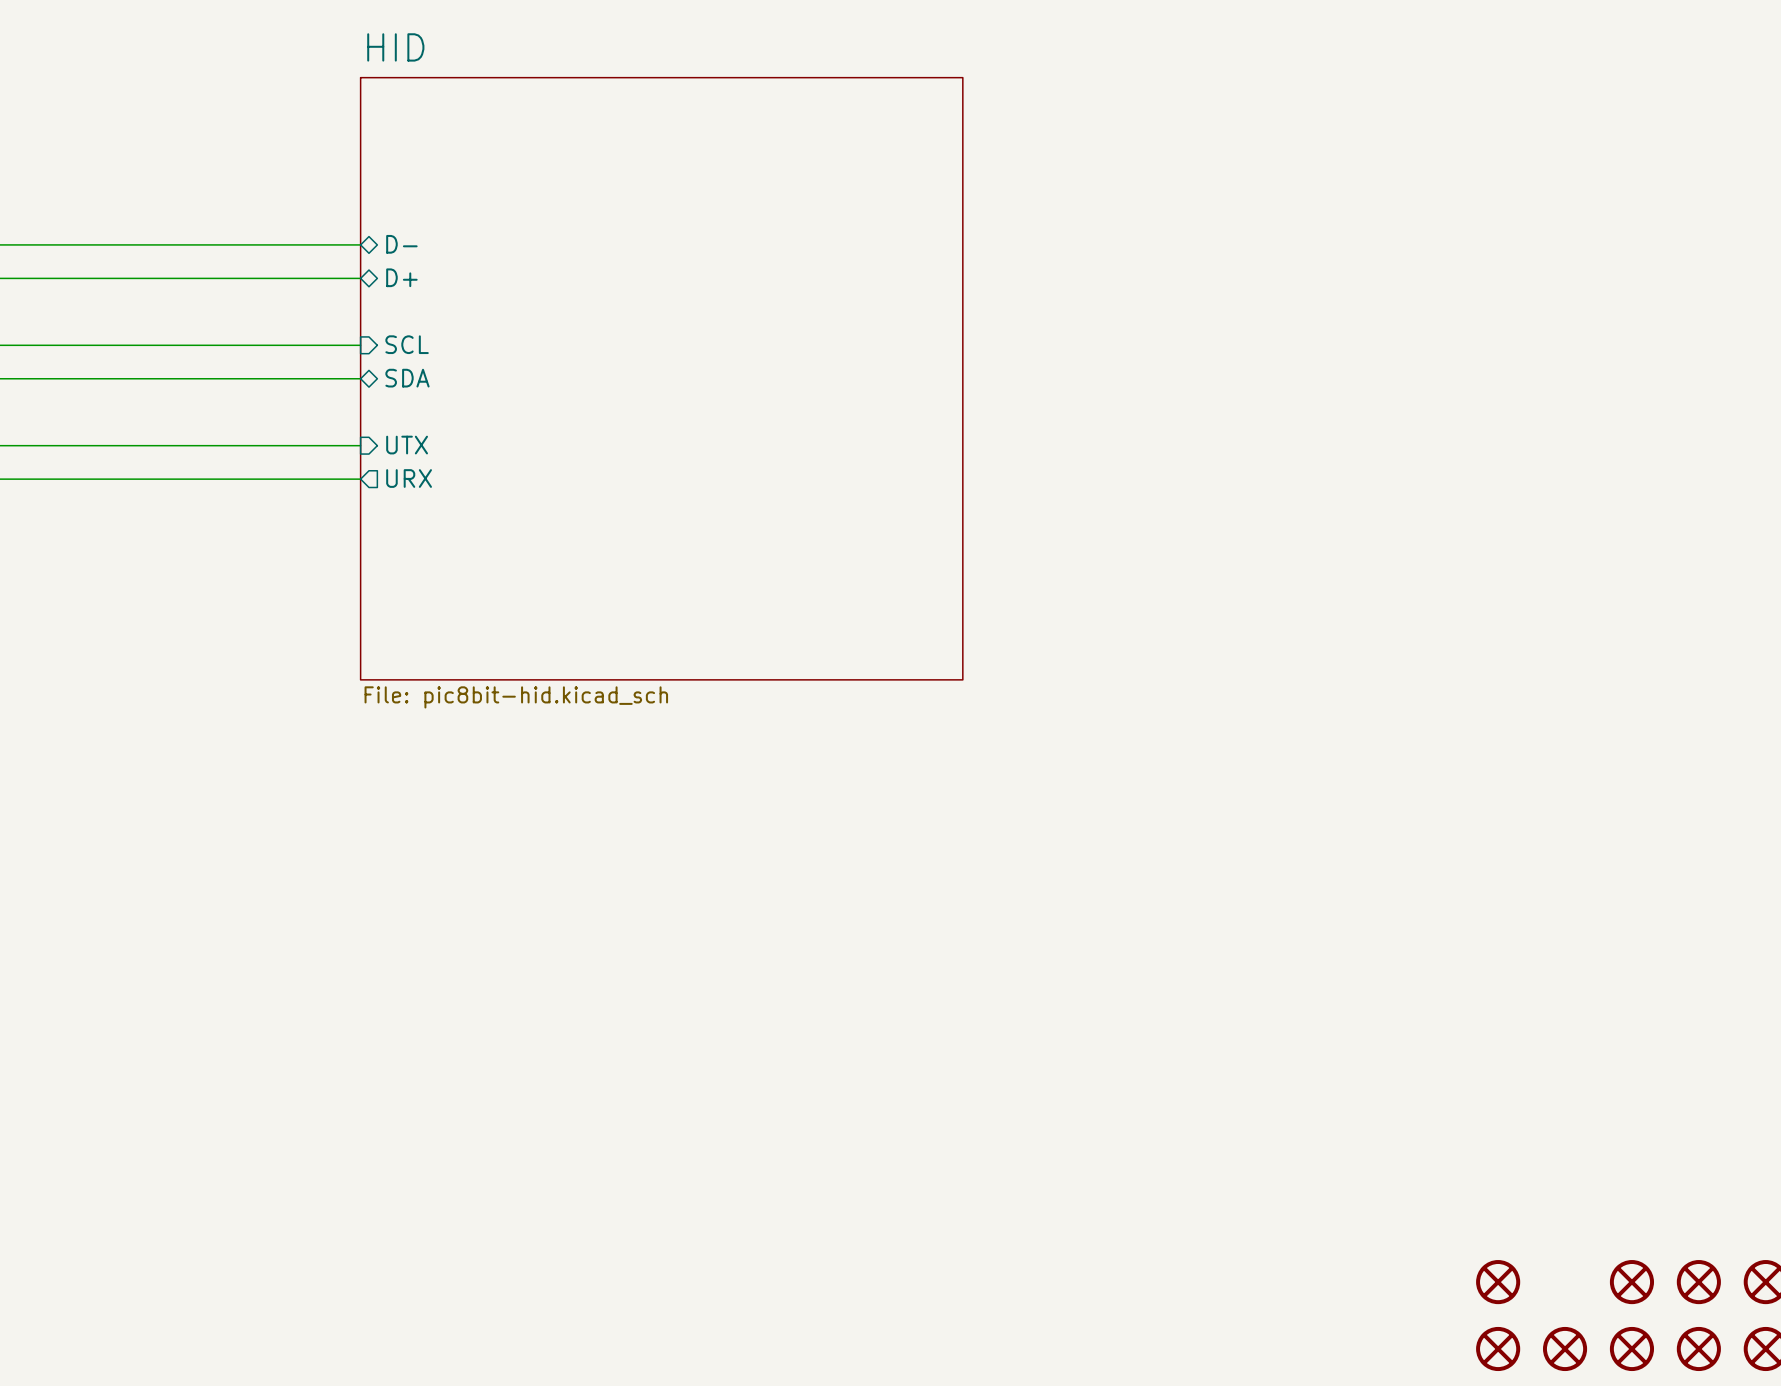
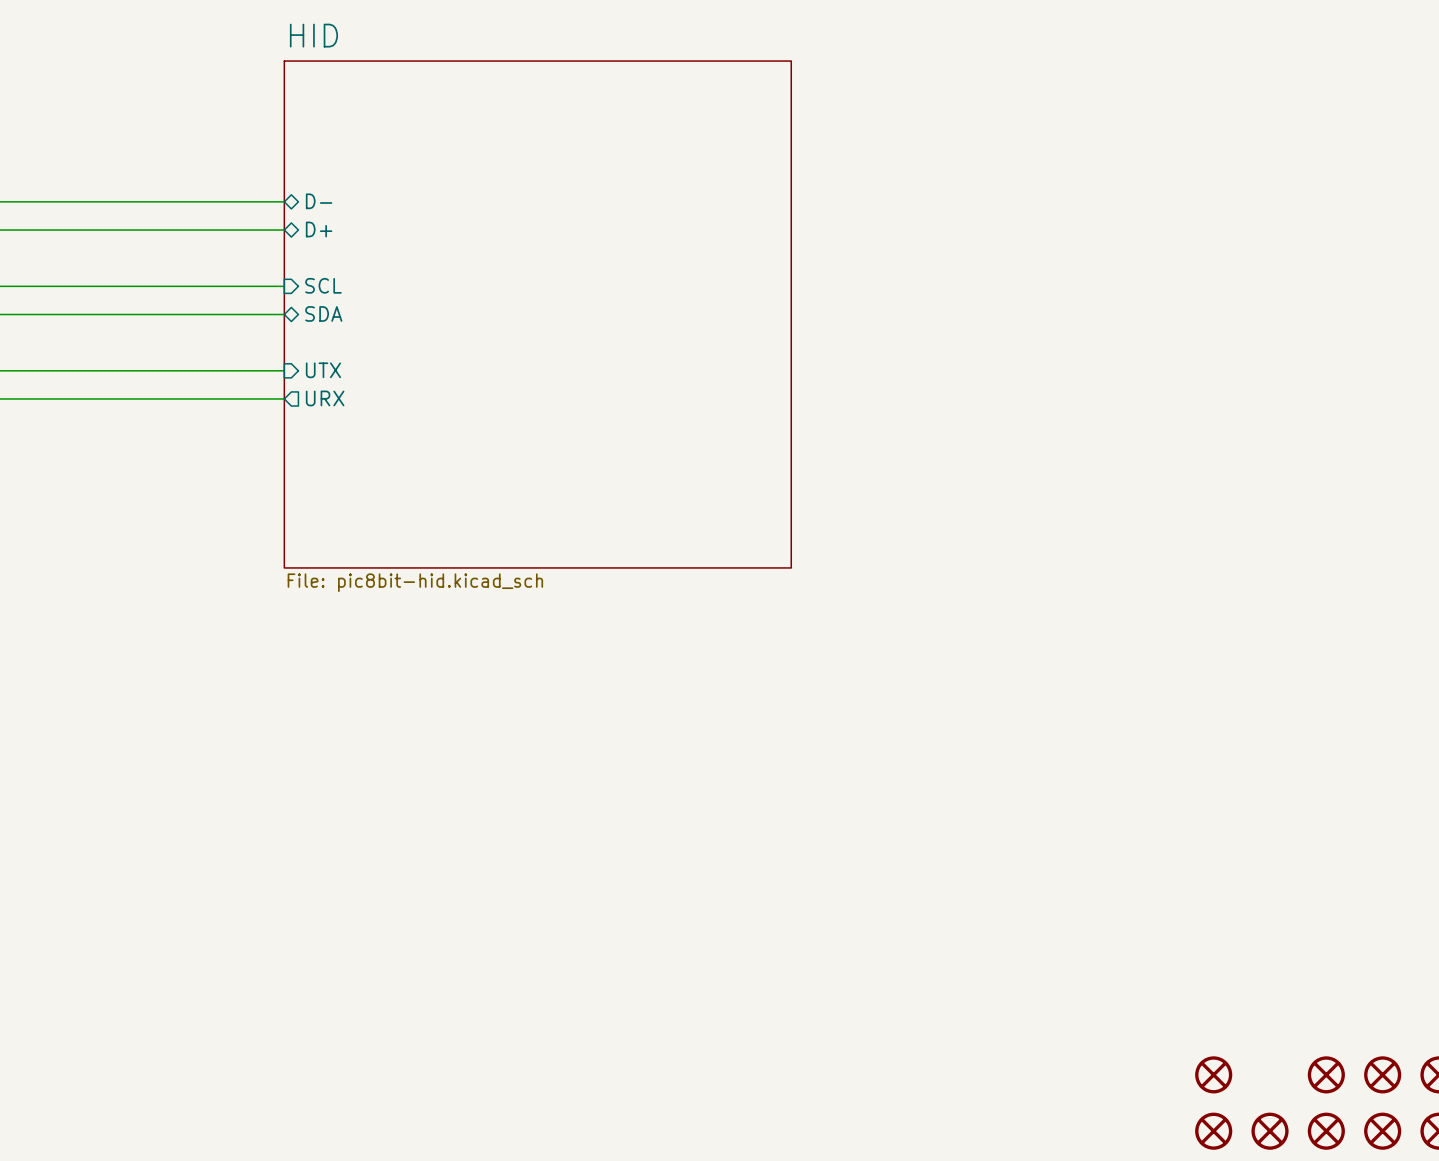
wire: none -> (256, 201) (284, 201)
sheet pin position: D- (401, 244) -> D- (319, 201)
sheet pin position: D+ (401, 277) -> D+ (319, 229)
wire: none -> (256, 230) (284, 230)
sheet pin position: SCL (407, 344) -> SCL (323, 285)
wire: none -> (256, 286) (284, 286)
wire: none -> (256, 314) (284, 314)
sheet pin position: SDA (407, 378) -> SDA (323, 313)
sheet HID position: (661, 378) -> (537, 314)
wire: none -> (256, 370) (284, 370)
sheet pin position: UTX (407, 445) -> UTX (323, 370)
sheet pin position: URX (409, 478) -> URX (325, 398)
wire: none -> (256, 398) (284, 398)

